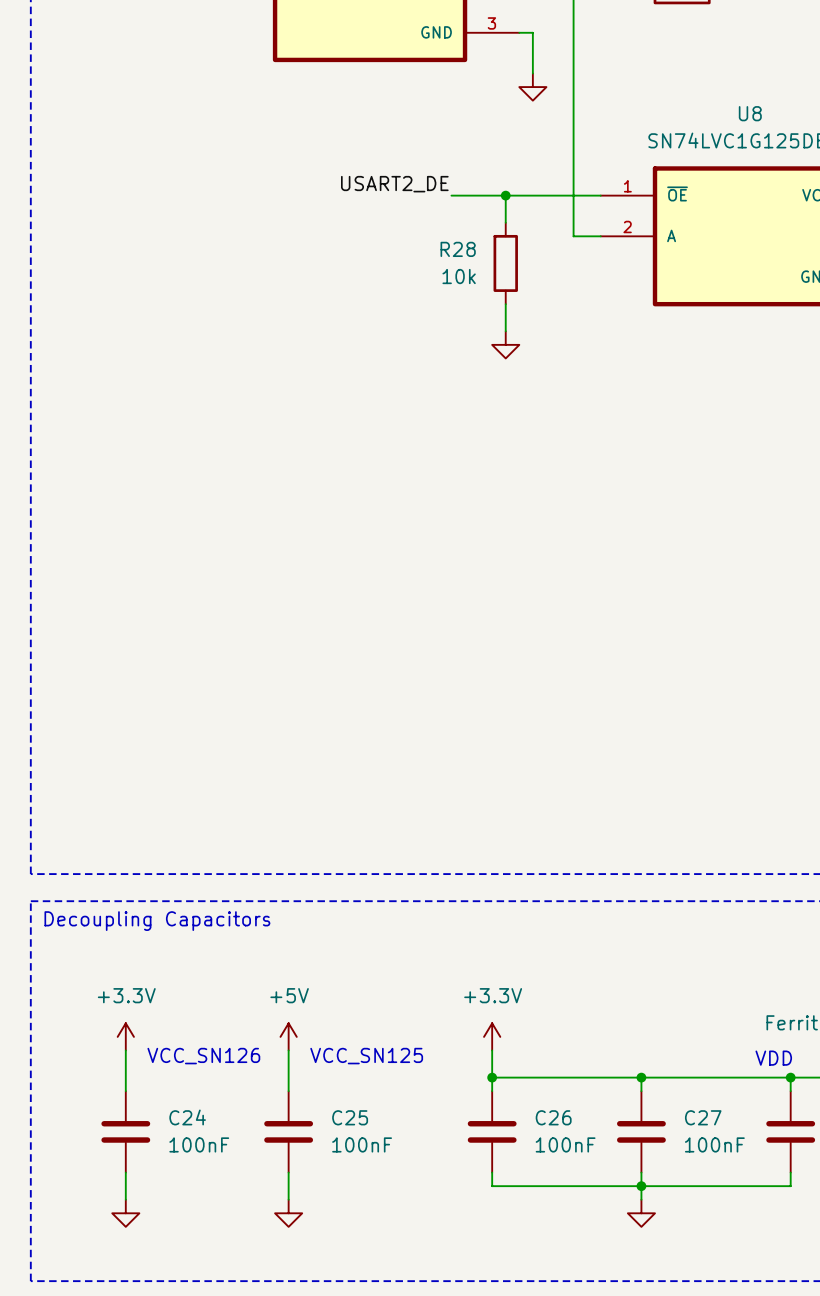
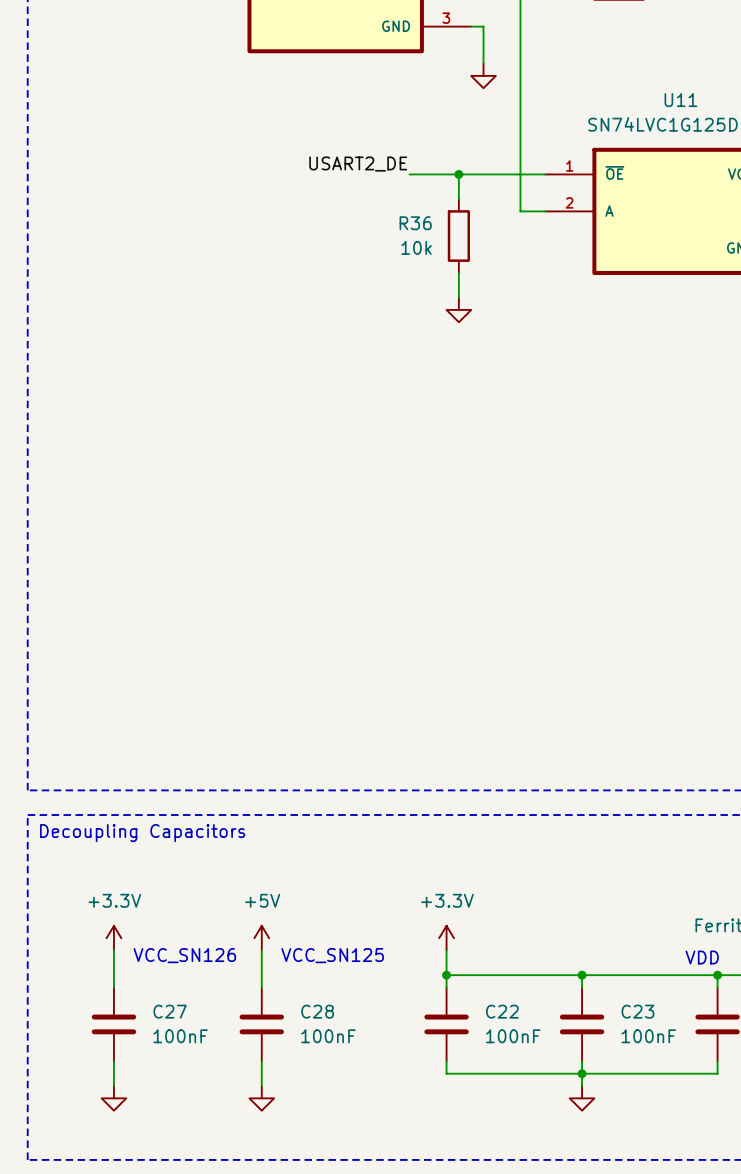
U8 name: U8 (750, 113) -> U11 (680, 100)
R28 name: R28 (458, 249) -> R36 (415, 223)
C24 name: C24 (187, 1117) -> C27 (170, 1011)
C25 name: C25 (350, 1117) -> C28 (317, 1011)
C26 name: C26 (553, 1117) -> C22 (502, 1011)
C27 name: C27 (703, 1117) -> C23 (637, 1011)

